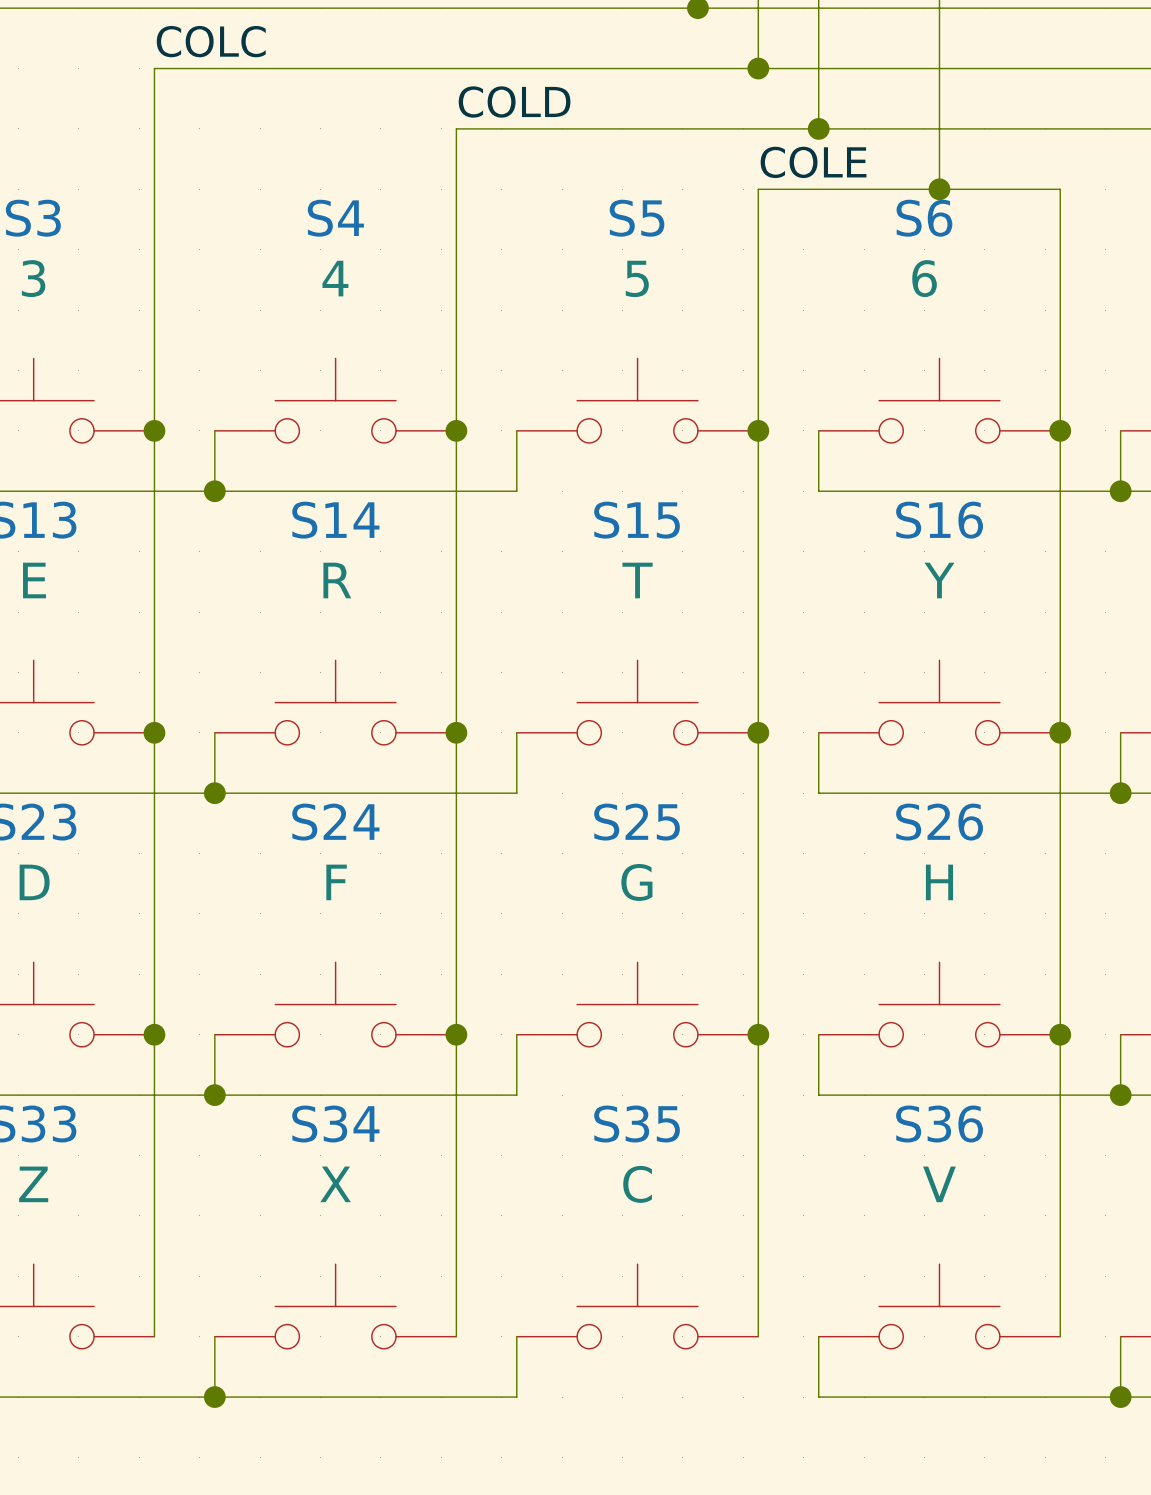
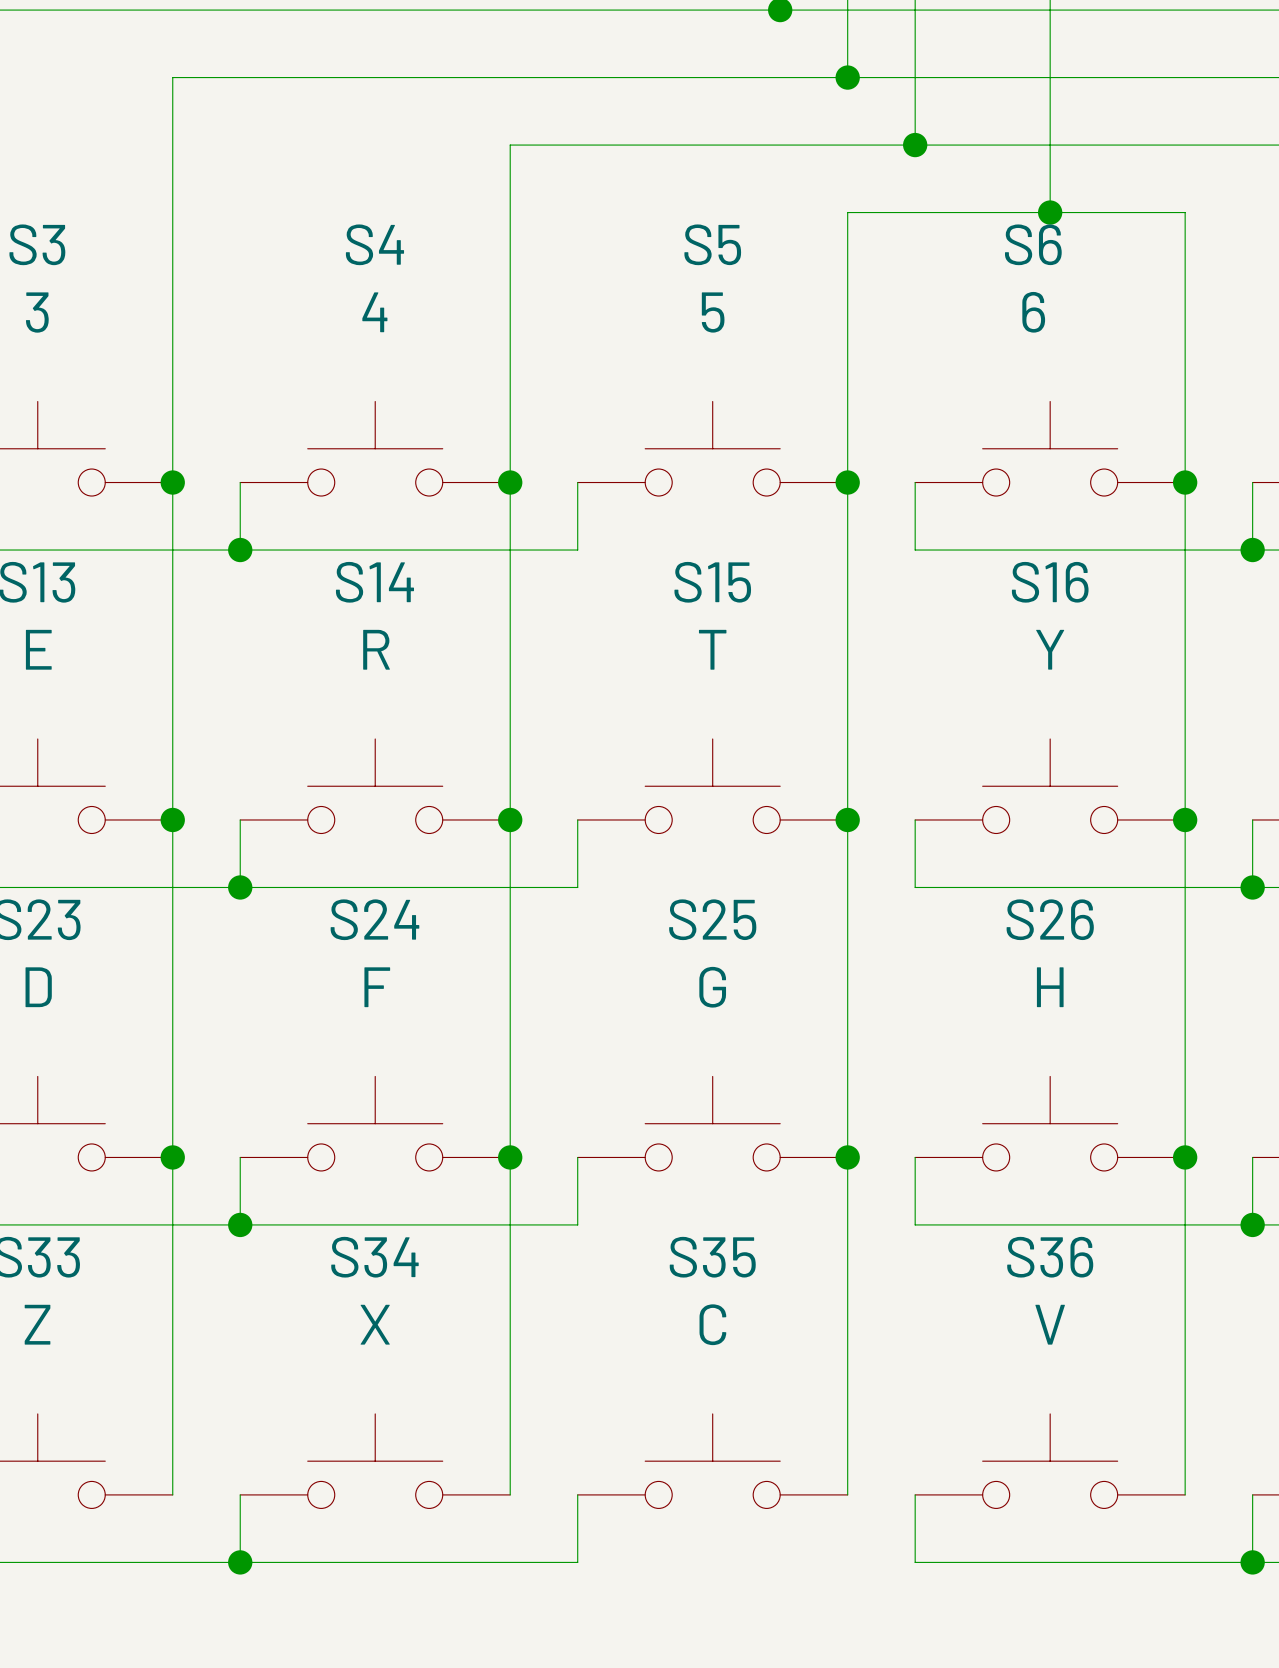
label: COLC (211, 41) -> none
label: COLD (514, 102) -> none
label: COLE (813, 162) -> none

